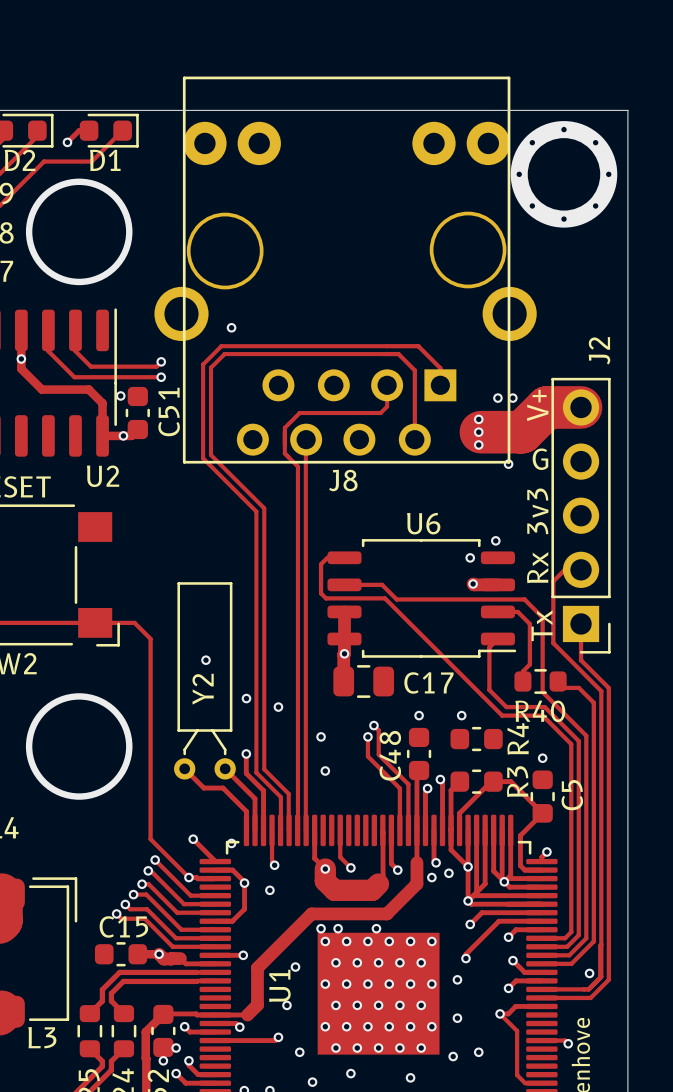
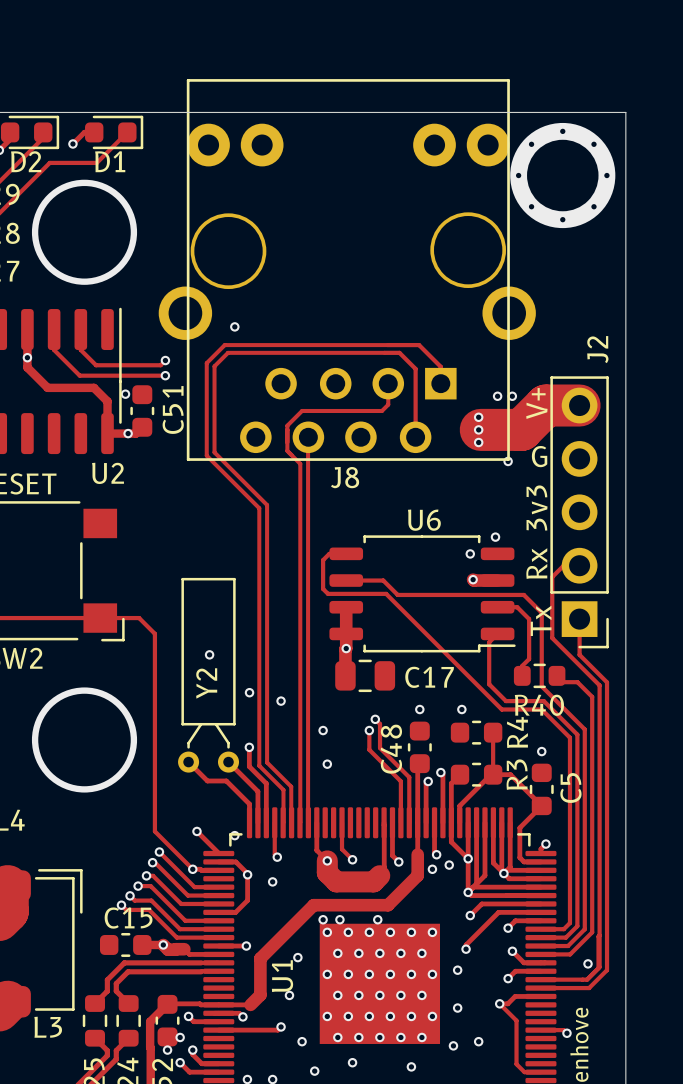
track: none -> (493, 732) (493, 774)

